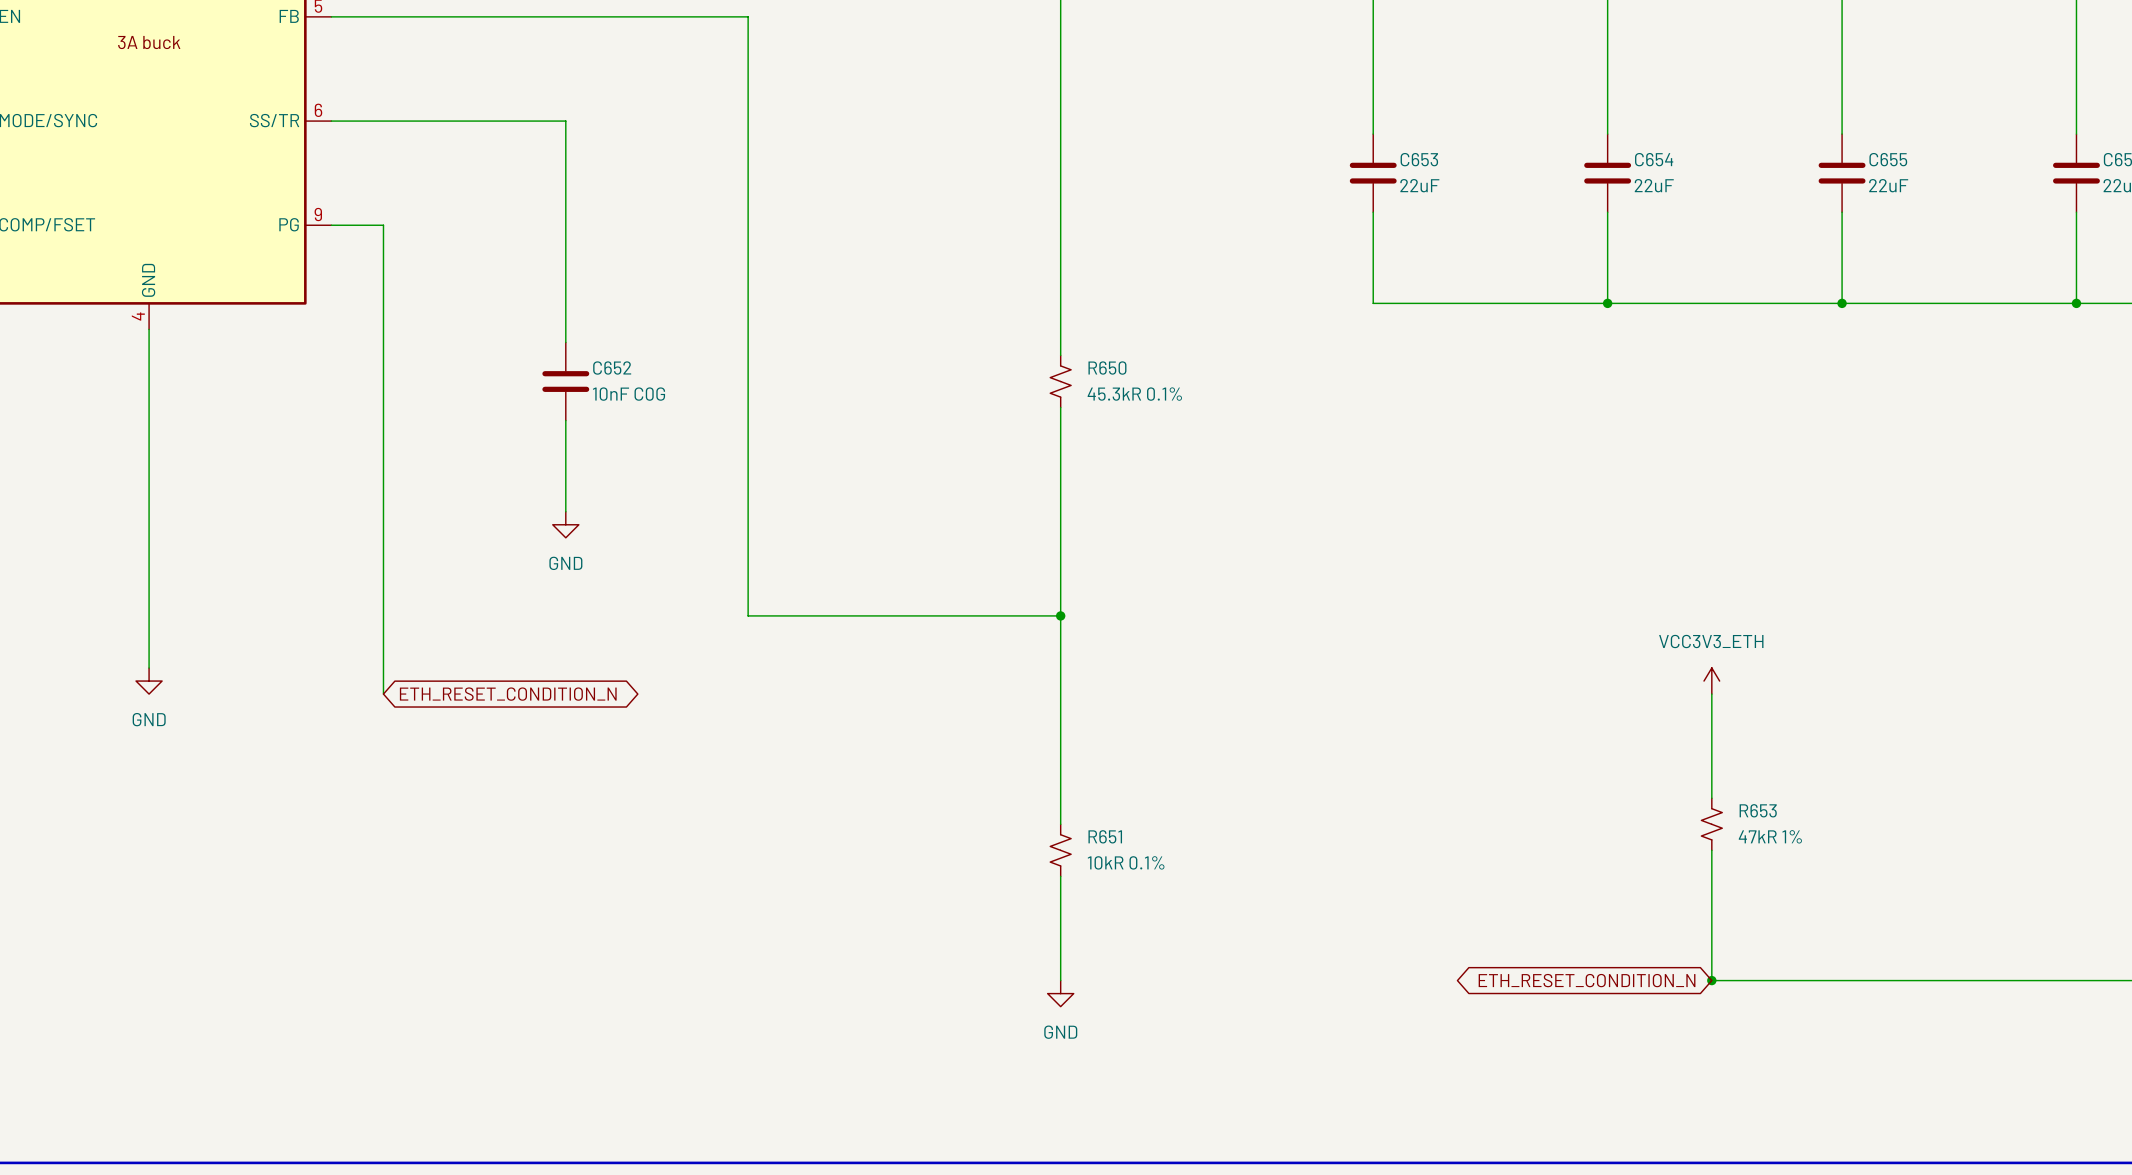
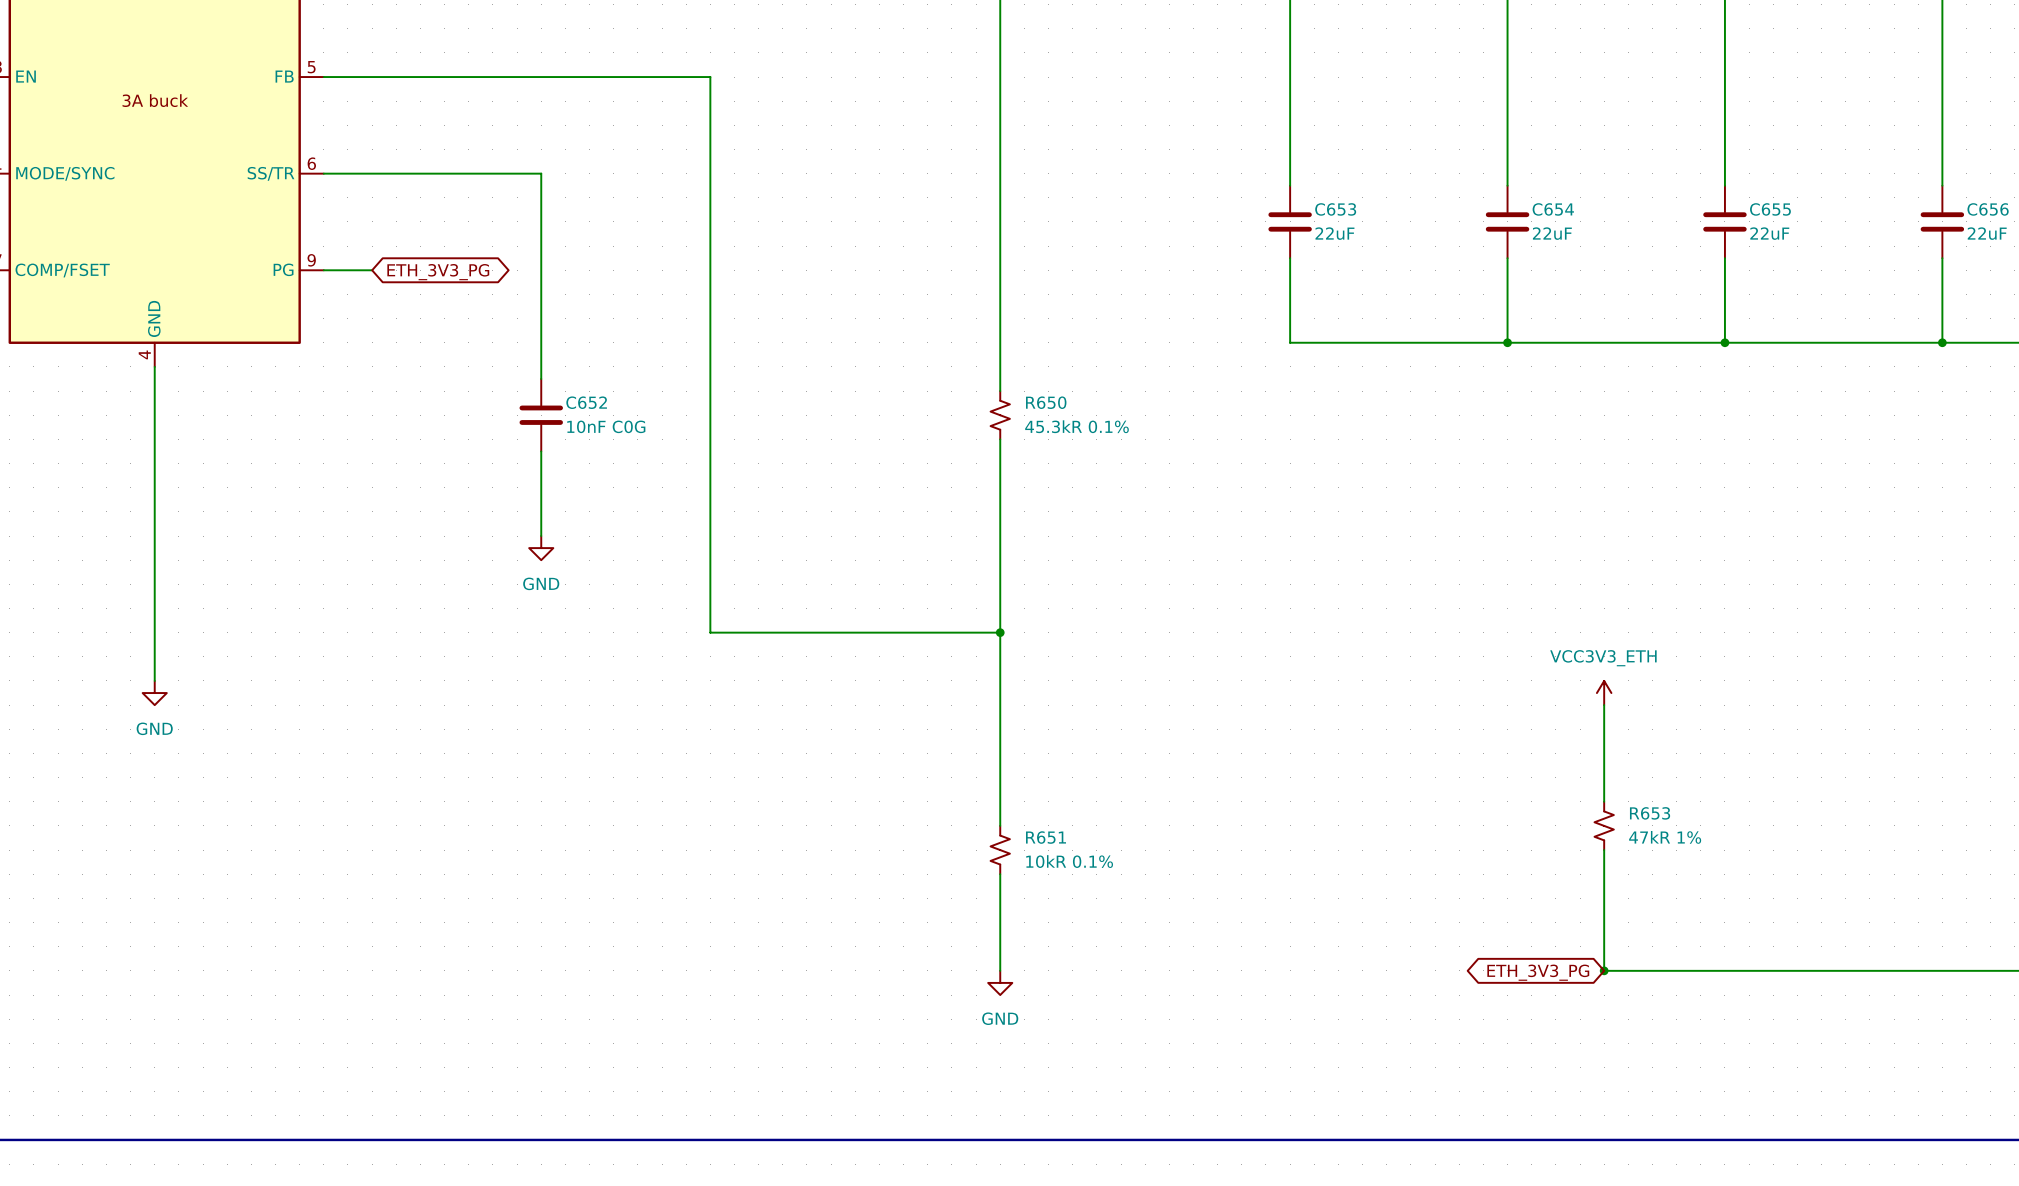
wire: (383, 225) (383, 694) -> none
global label: none -> ETH_3V3_PG (438, 272)
global label: ETH_RESET_CONDITION_N (508, 694) -> none
global label: ETH_RESET_CONDITION_N (1587, 980) -> ETH_3V3_PG (1538, 972)

